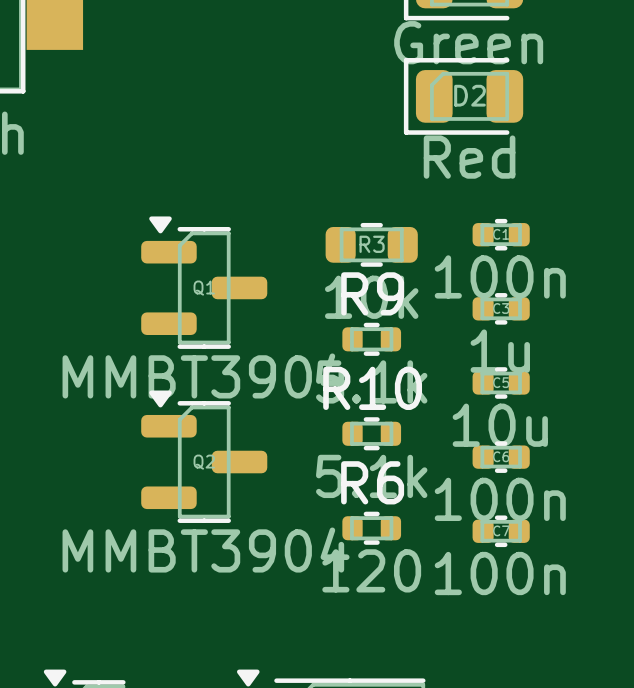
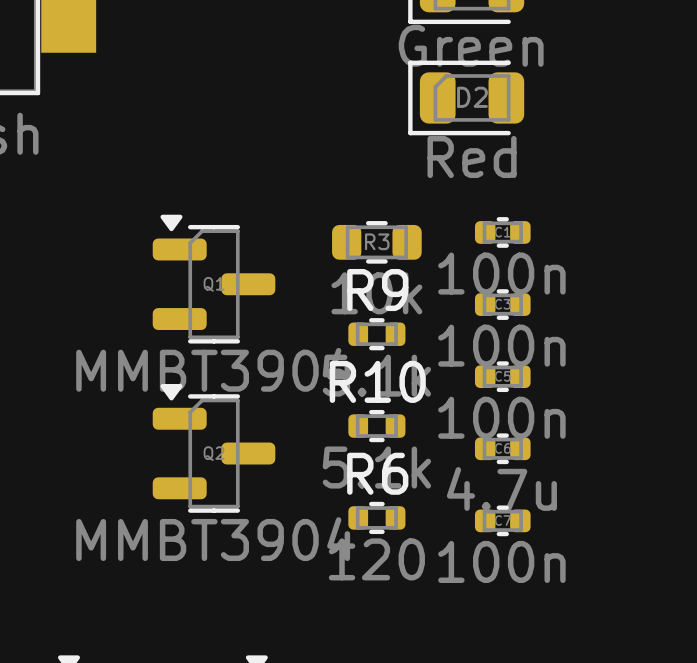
C3 value: 1u (500, 351) -> 100n (501, 345)
C5 value: 10u (500, 425) -> 100n (501, 417)
C6 value: 100n (500, 499) -> 4.7u (501, 488)

